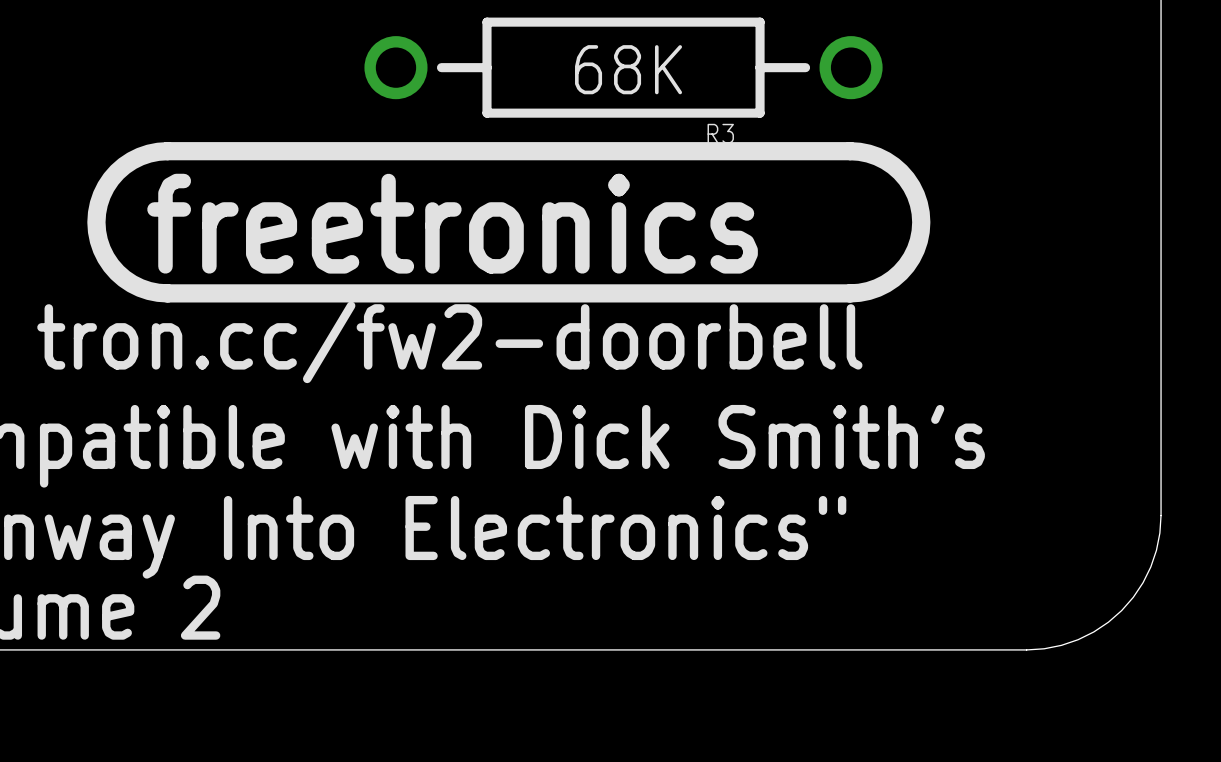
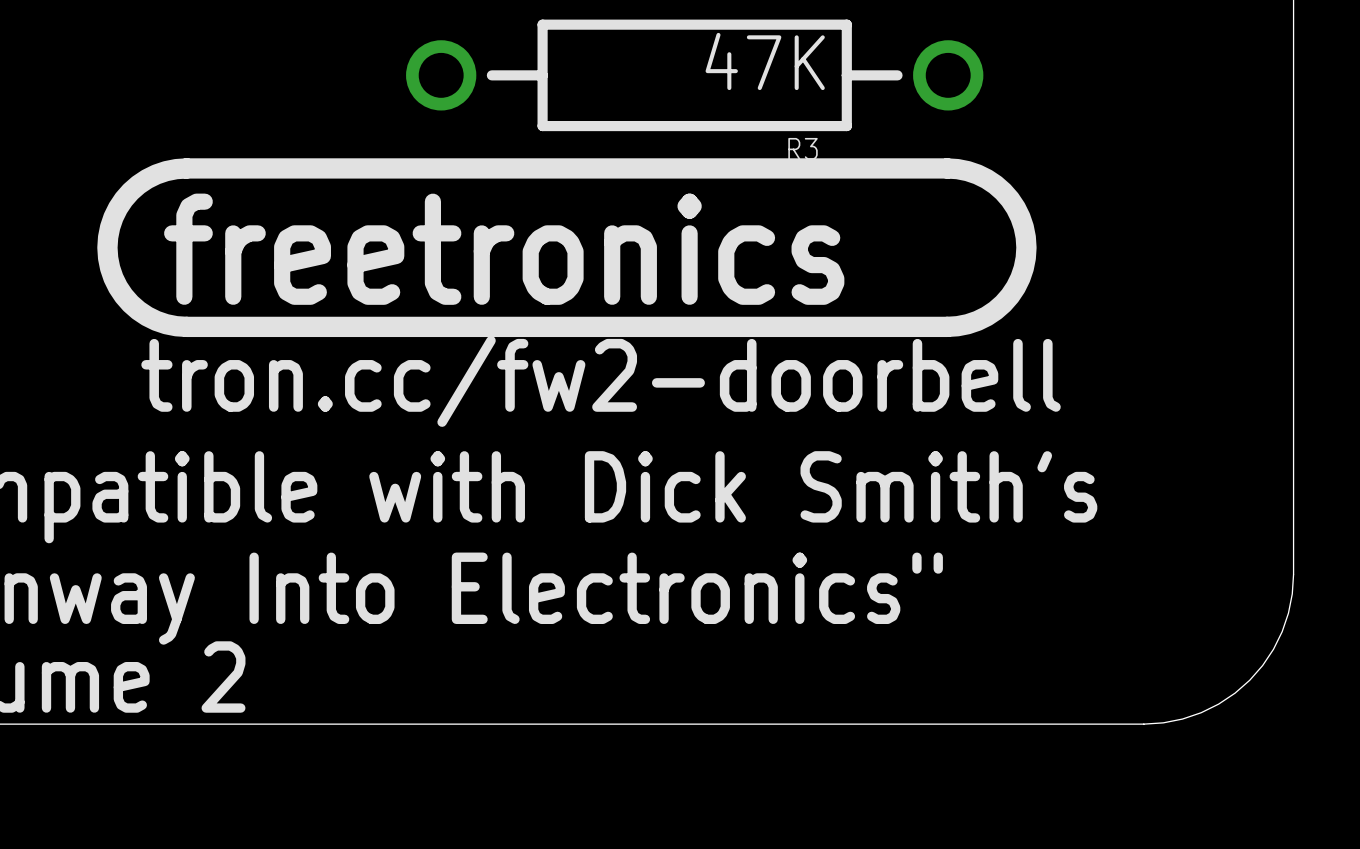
R3 value: 68K (628, 69) -> 47K (765, 61)
text position: tron.cc/fw2-doorbell (449, 342) -> tron.cc/fw2-doorbell (601, 381)

